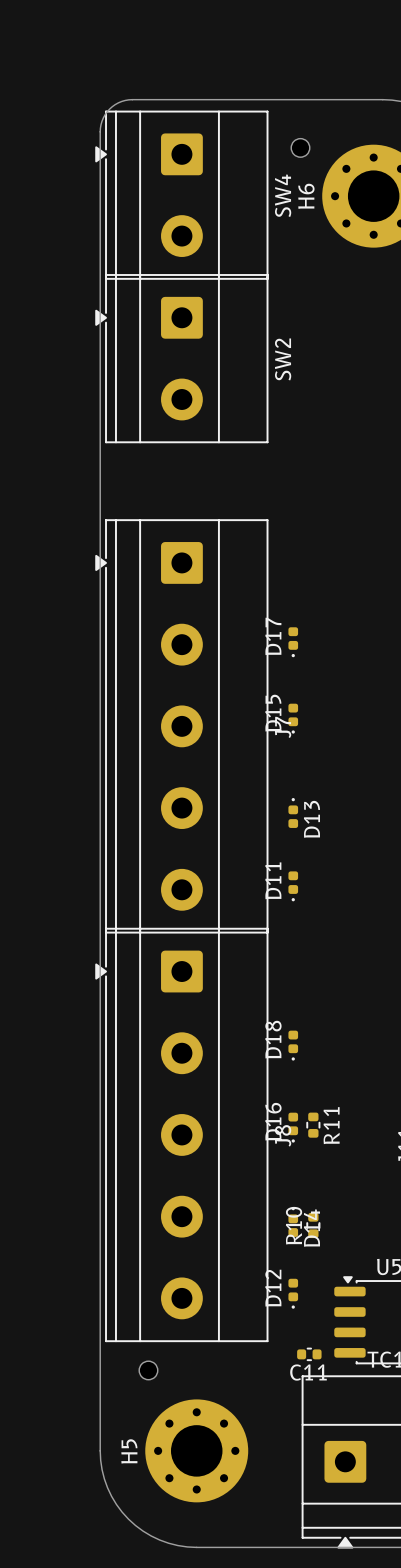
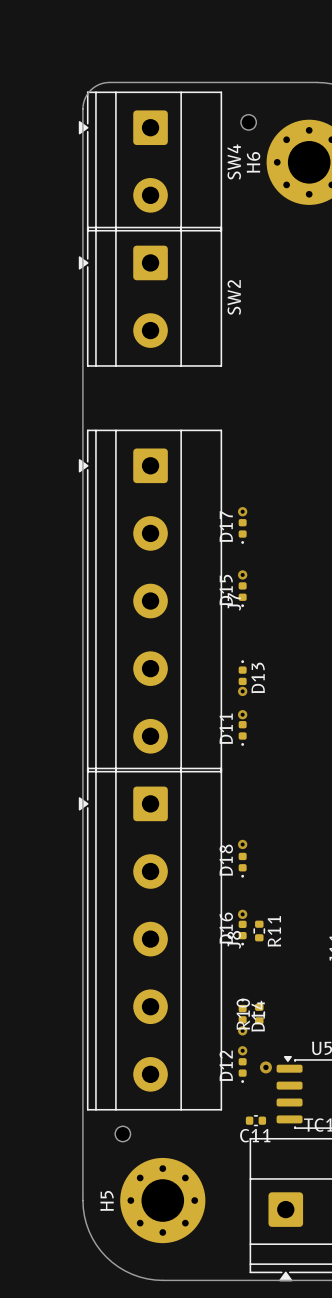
via: none -> (242, 511)
via: none -> (242, 574)
via: none -> (242, 691)
via: none -> (242, 714)
via: none -> (242, 844)
via: none -> (242, 914)
via: none -> (242, 1030)
via: none -> (242, 1050)
via: none -> (265, 1067)

